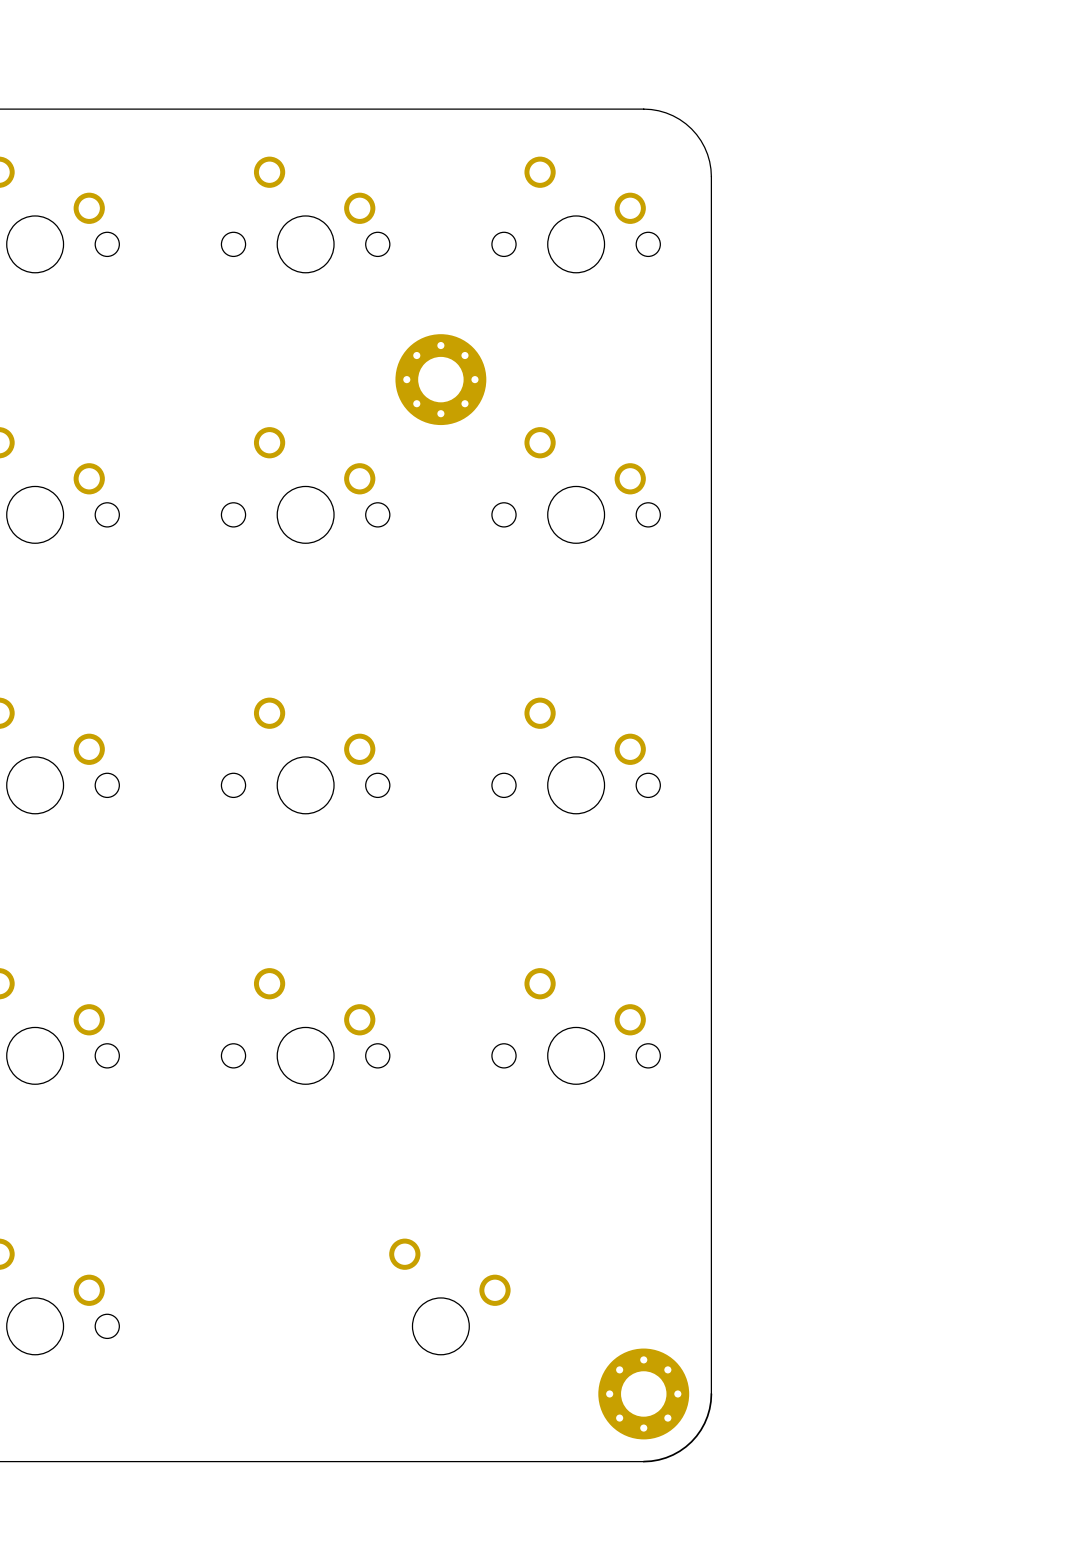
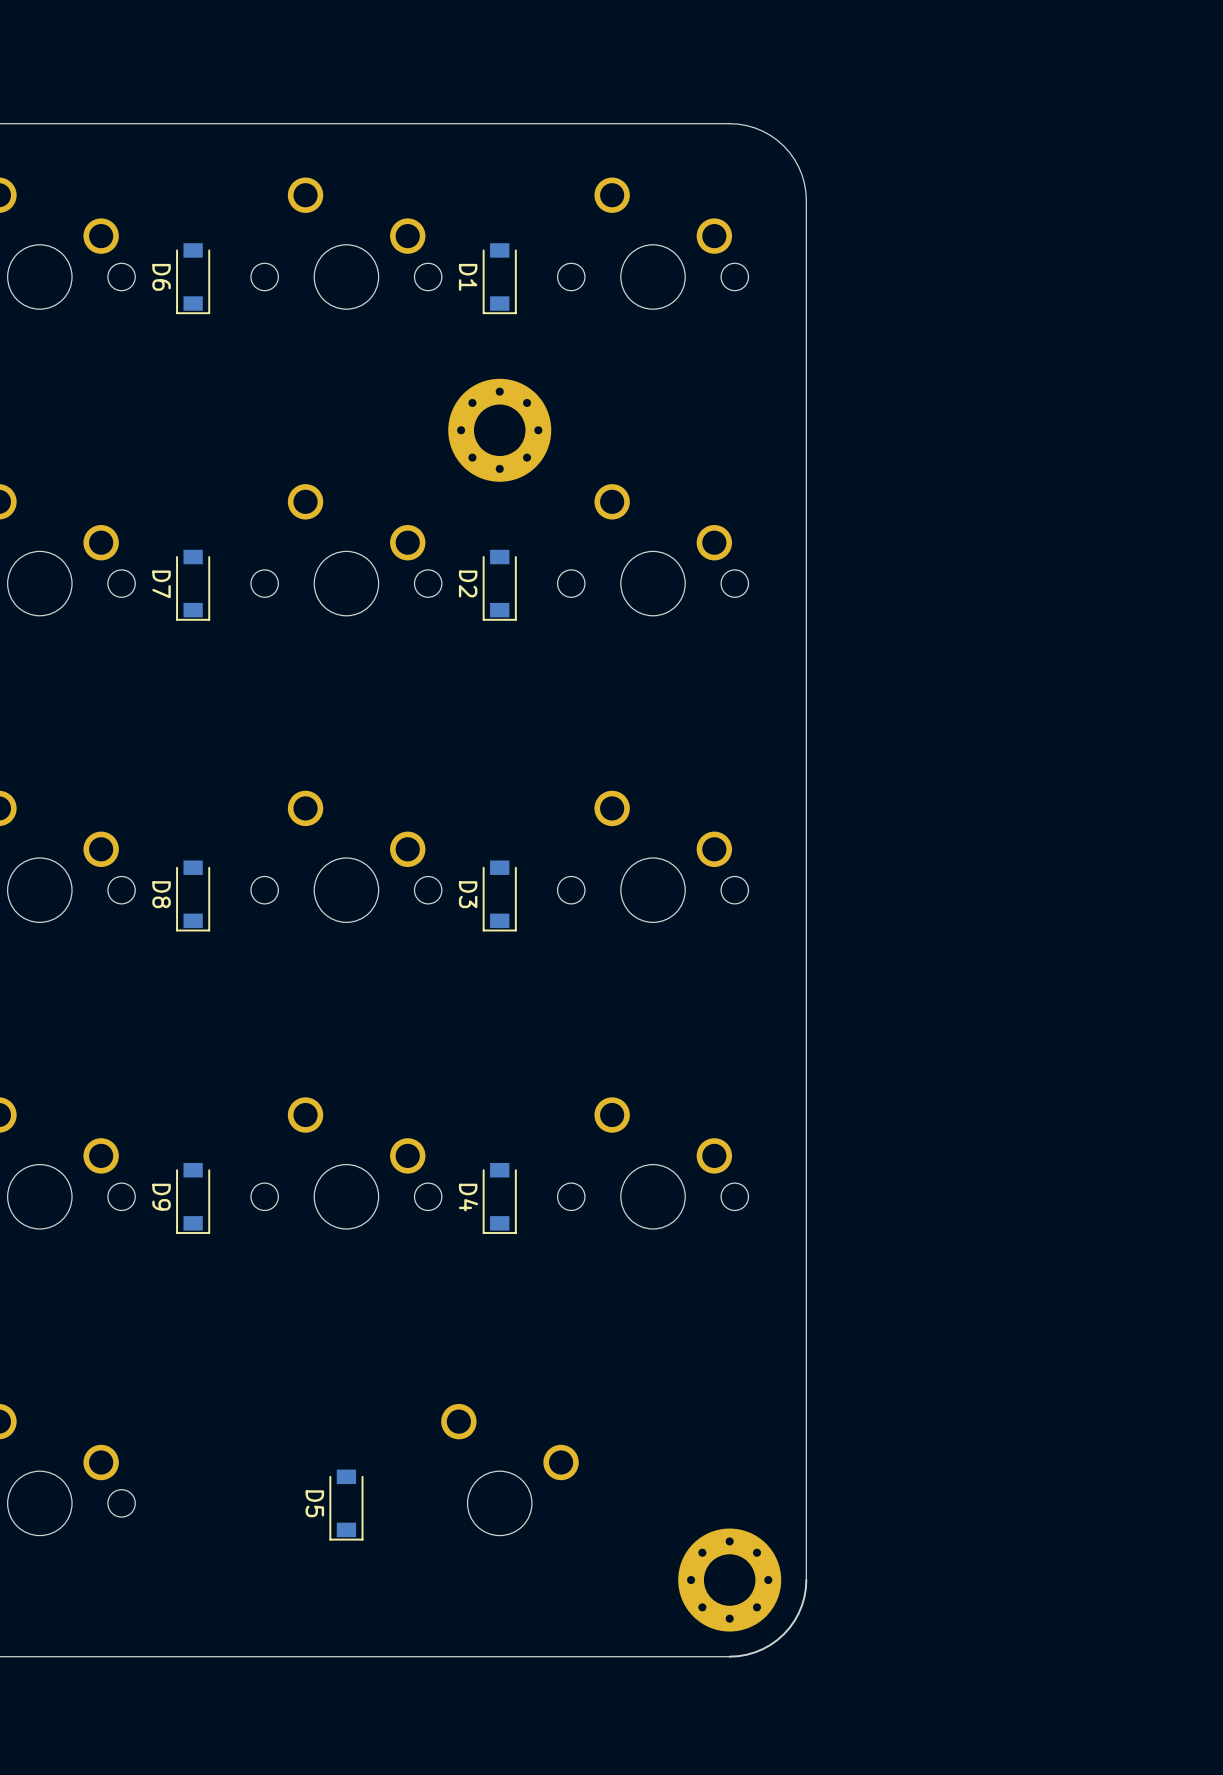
D6: none -> (193, 278)
D1: none -> (499, 278)
D7: none -> (193, 585)
D2: none -> (499, 585)
D8: none -> (193, 895)
D3: none -> (499, 895)
D9: none -> (193, 1198)
D4: none -> (499, 1198)
D5: none -> (346, 1505)

